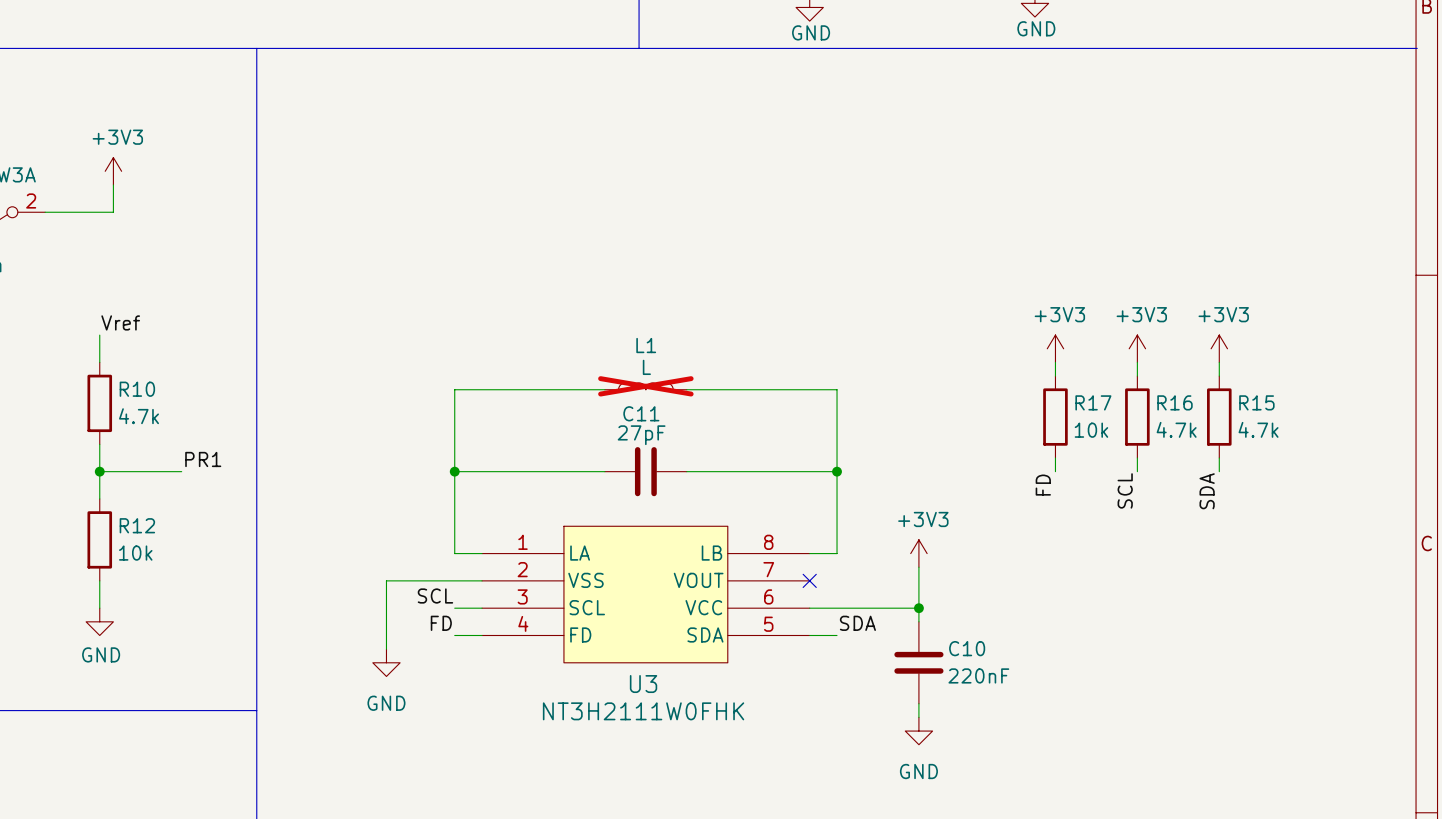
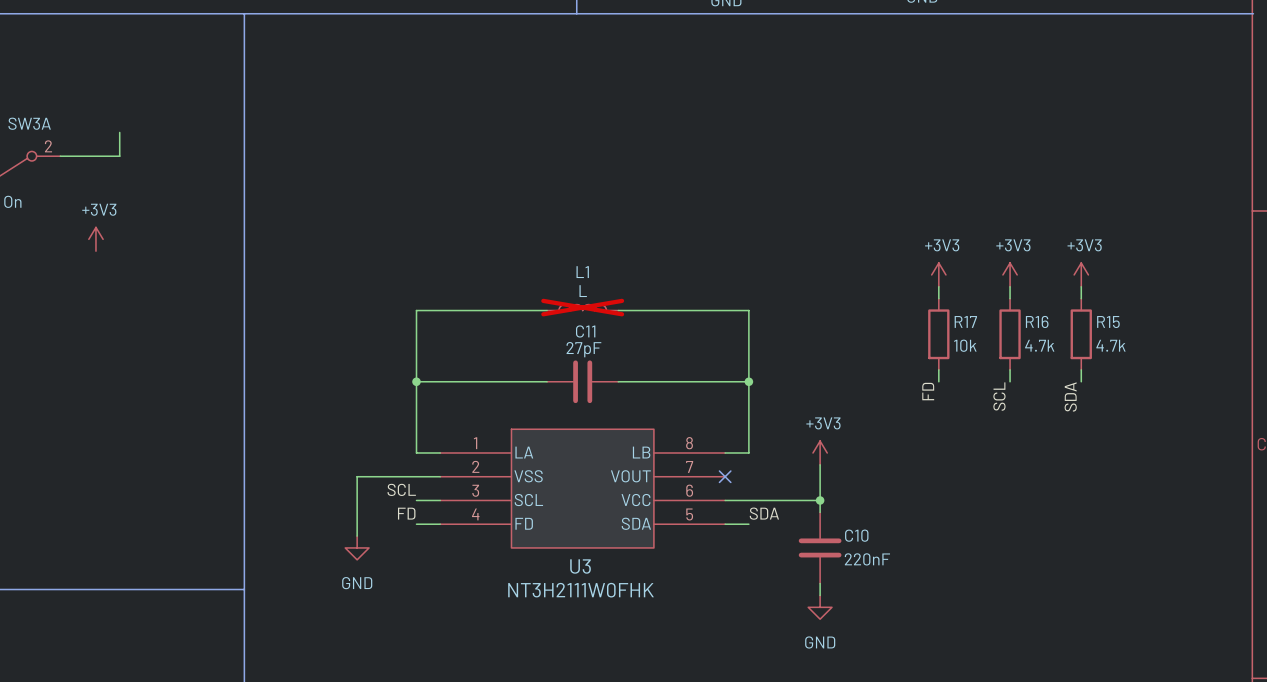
power symbol position: +3V3 (113, 171) -> +3V3 (95, 239)
label: Vref (120, 322) -> none
wire: (99, 335) (99, 362) -> none
R10: 4.7k (99, 403) -> none
wire: (99, 444) (99, 498) -> none
label: PR1 (203, 459) -> none
wire: (99, 471) (181, 471) -> none
junction: (99, 471) -> none
R12: 10k (99, 539) -> none
wire: (99, 580) (99, 608) -> none
power symbol: GND (99, 621) -> none

